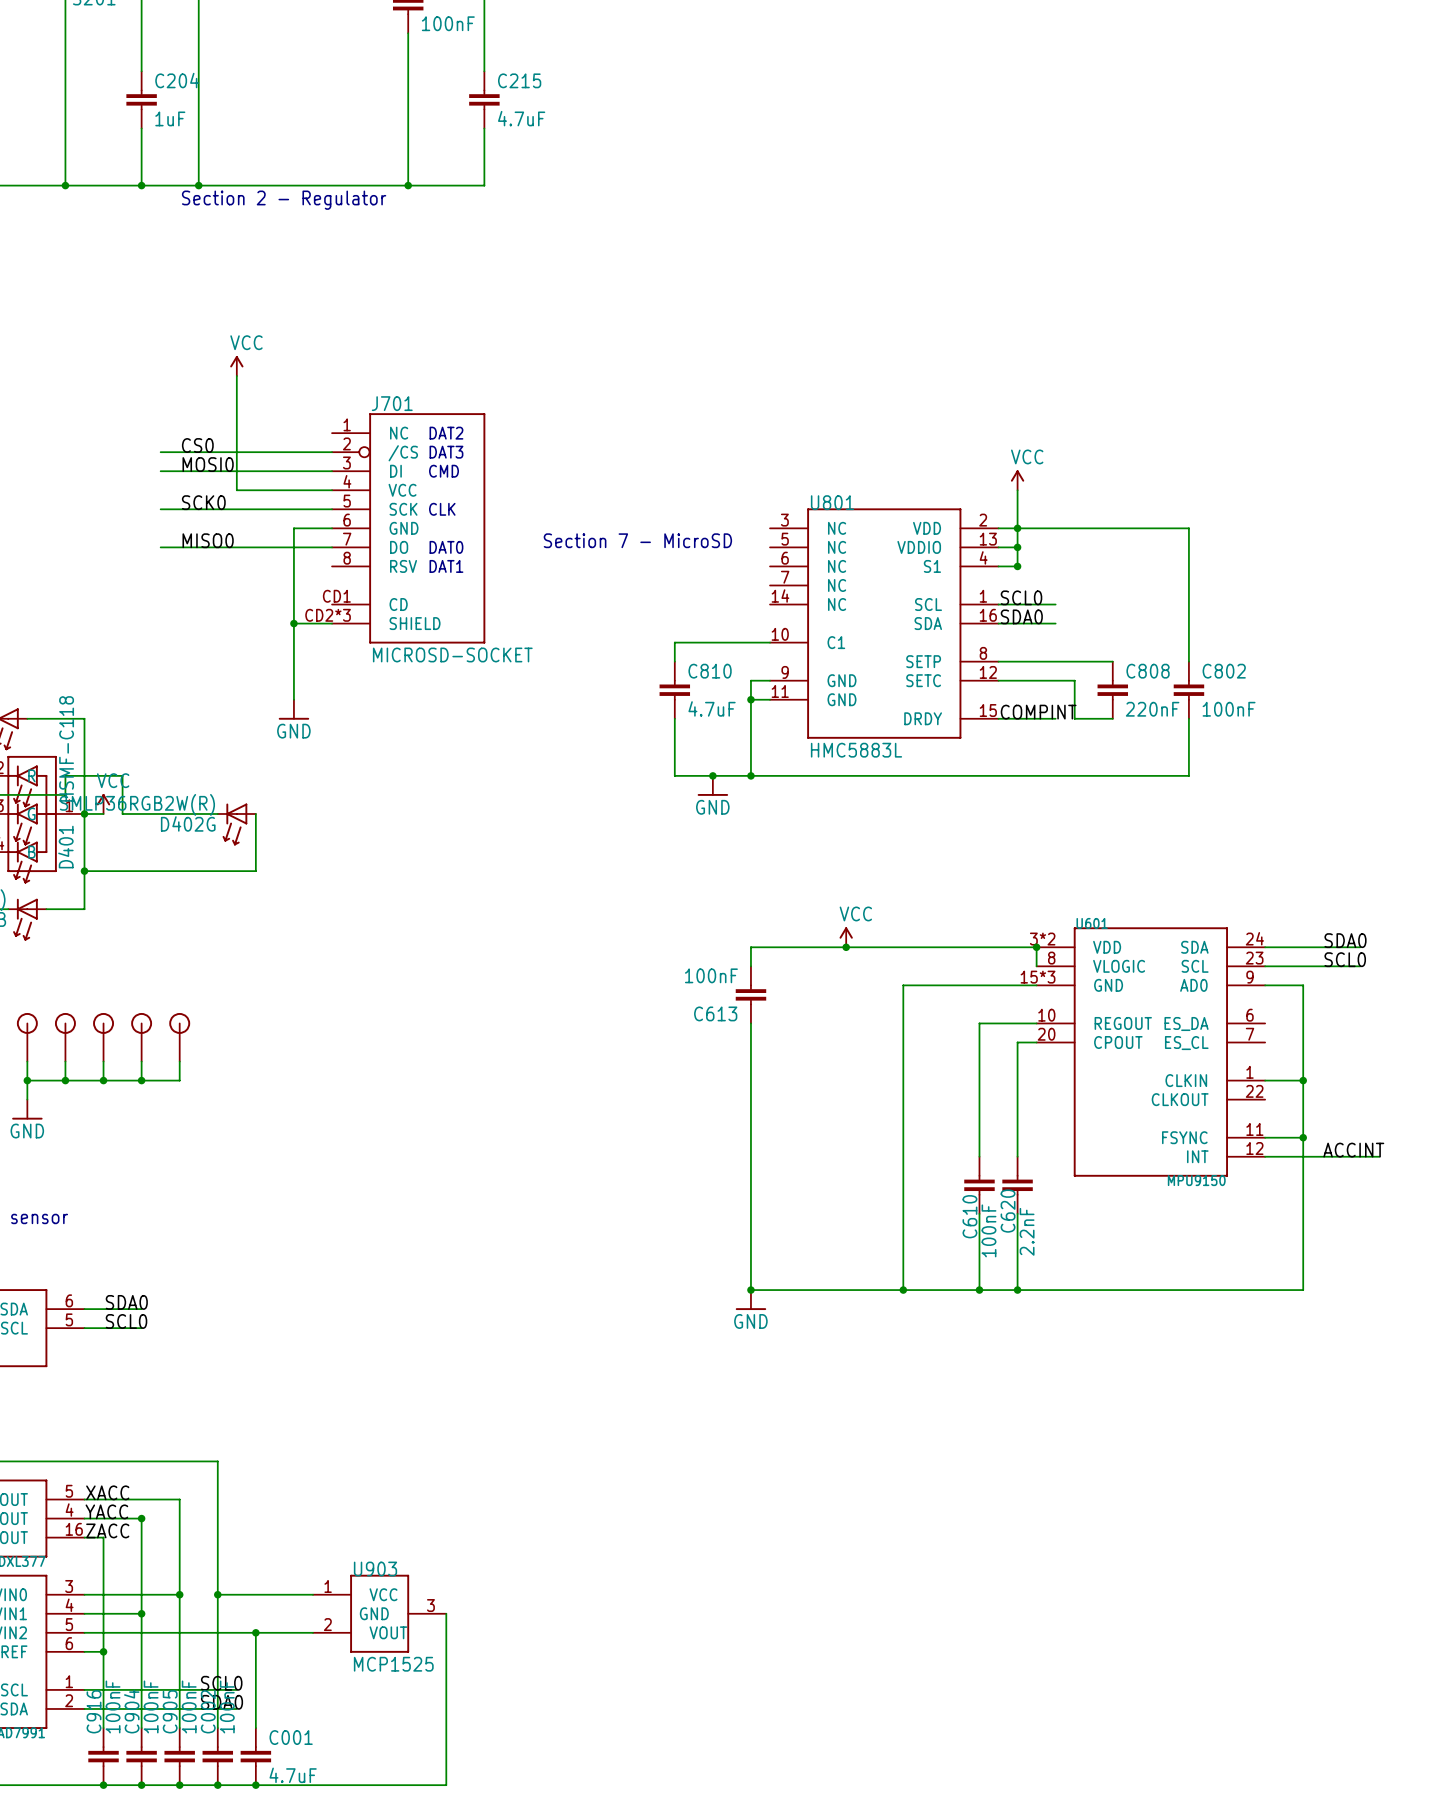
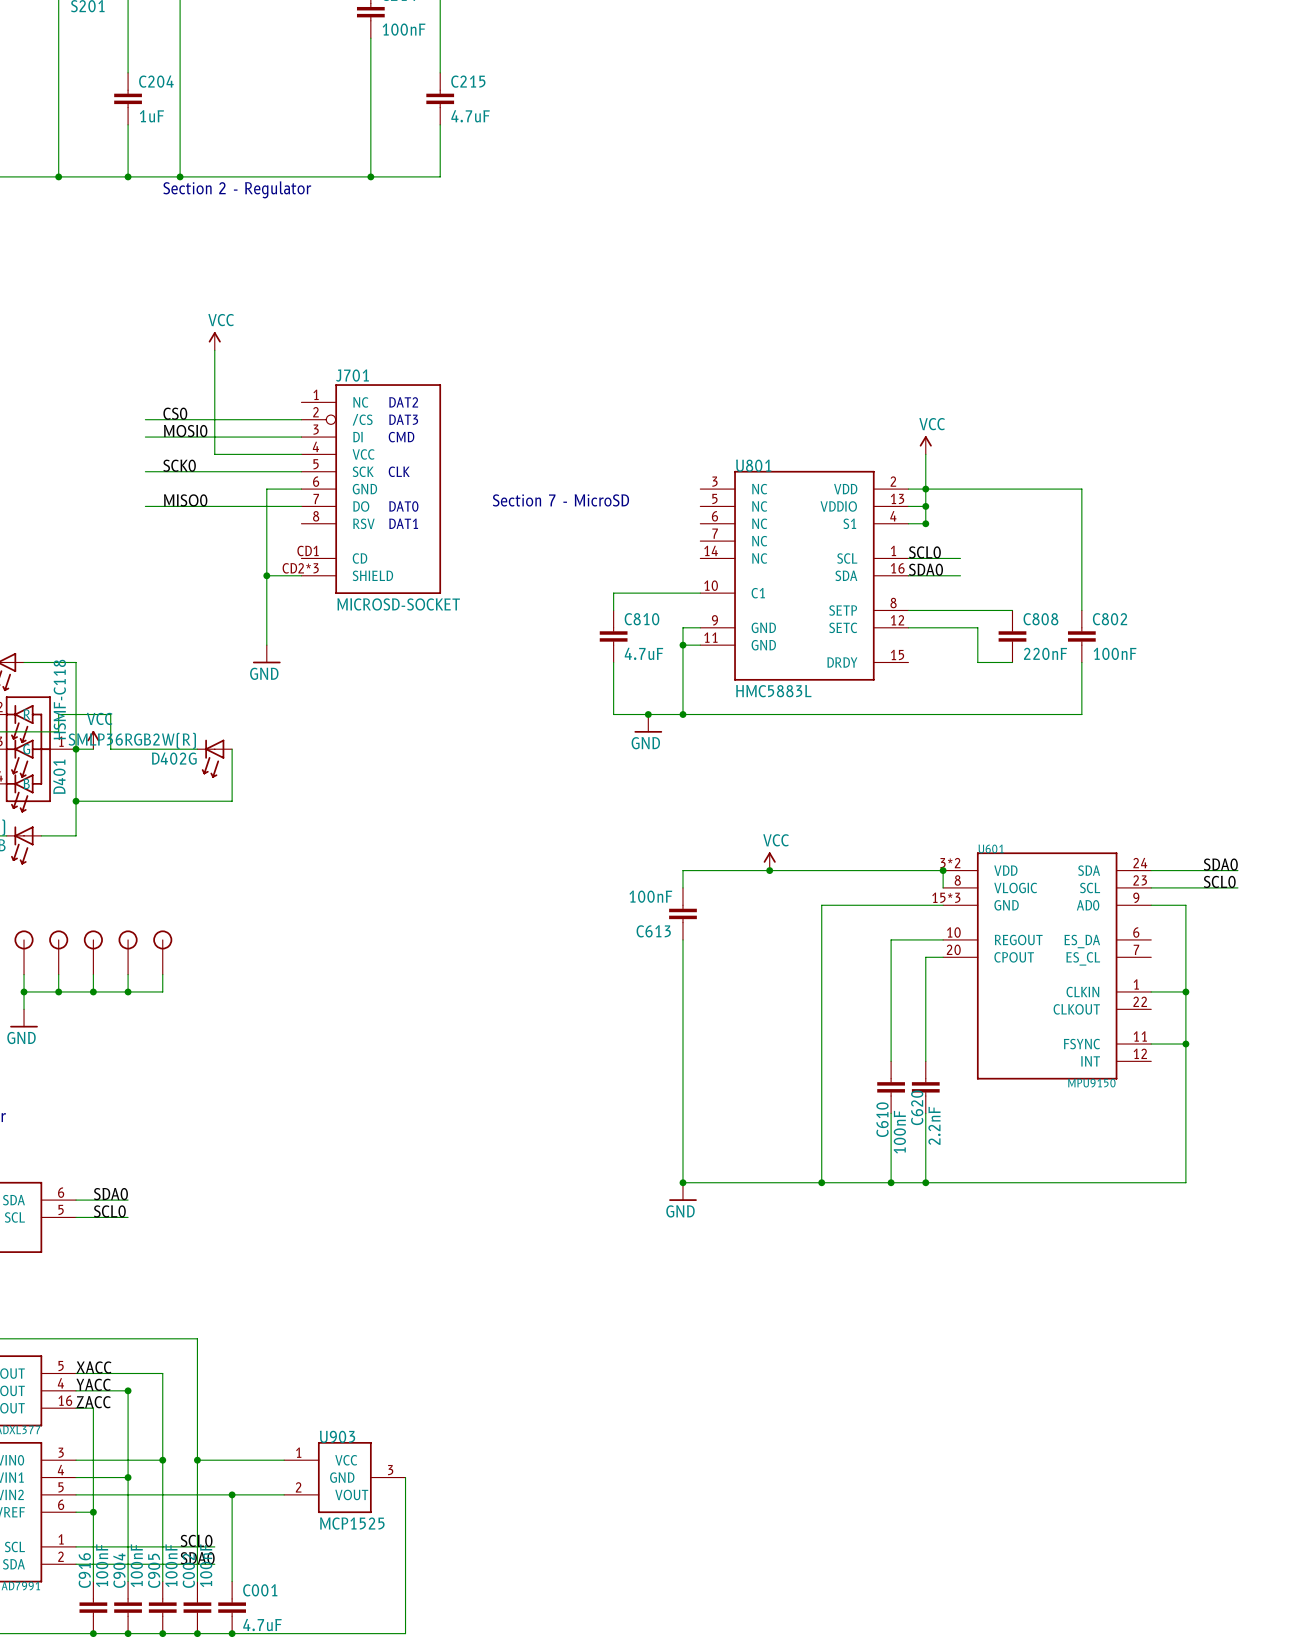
label: COMPINT (1038, 712) -> none
wire: (998, 718) (1055, 718) -> none
label: ACCINT (1353, 1150) -> none
wire: (1265, 1156) (1379, 1156) -> none

